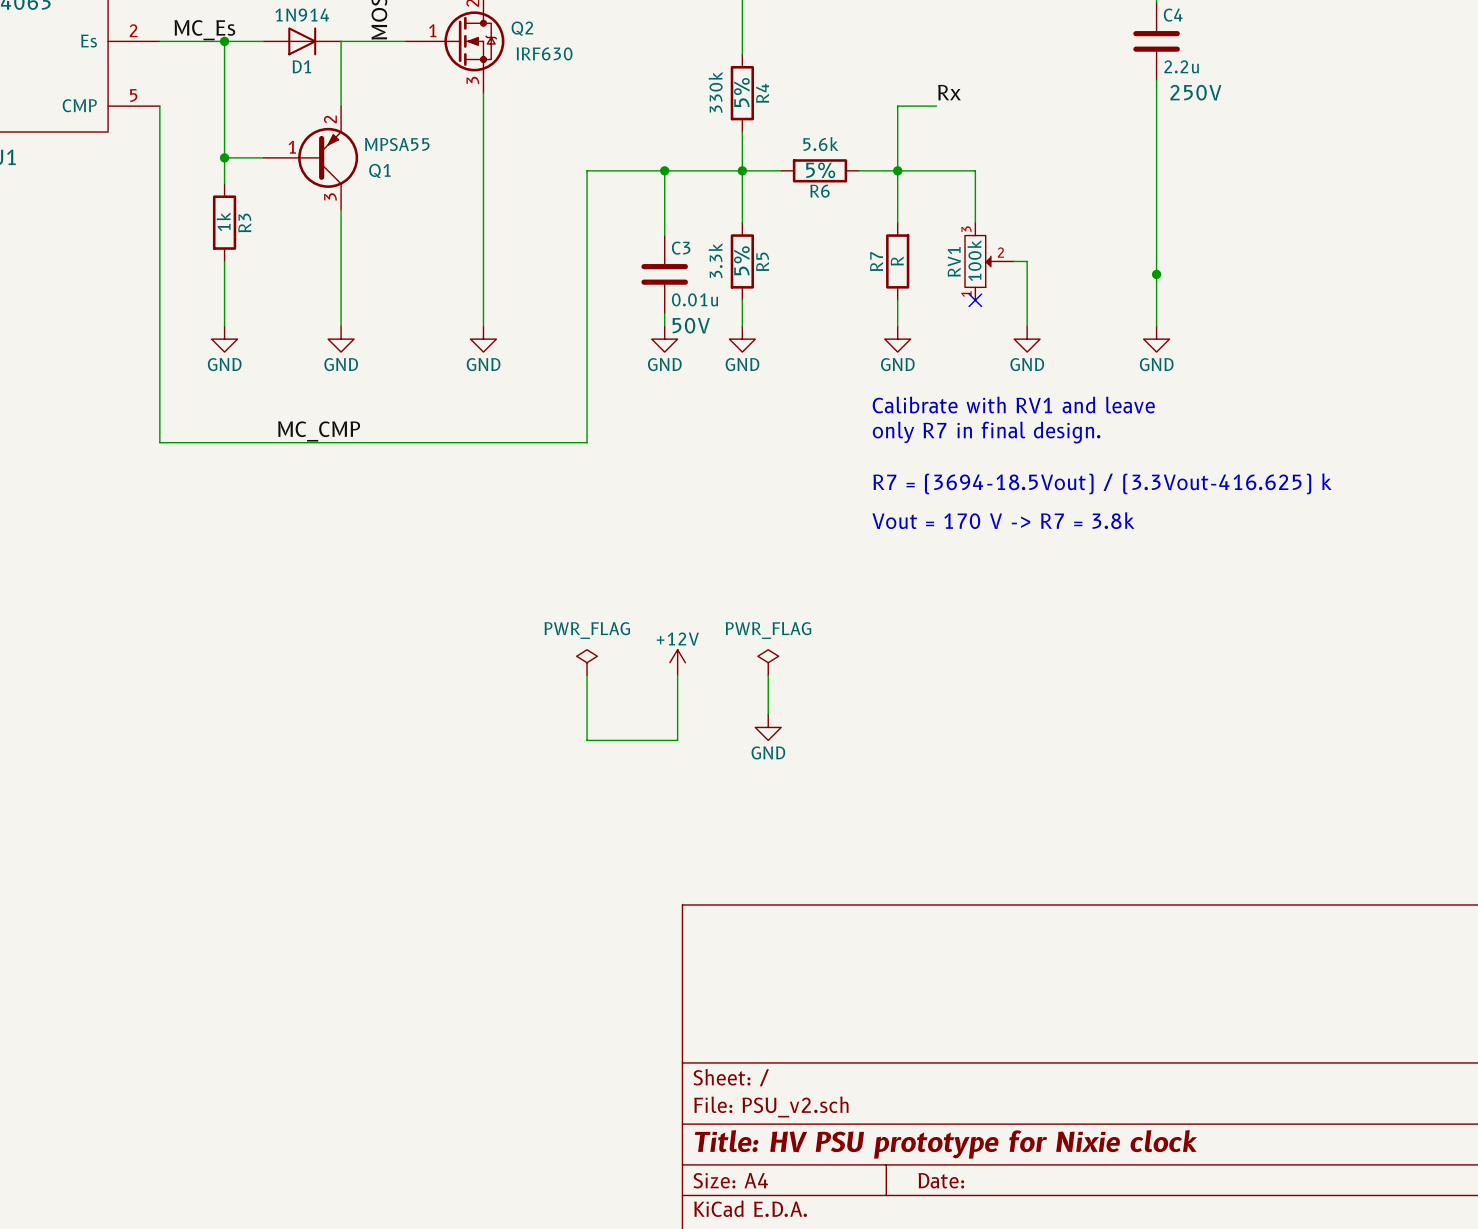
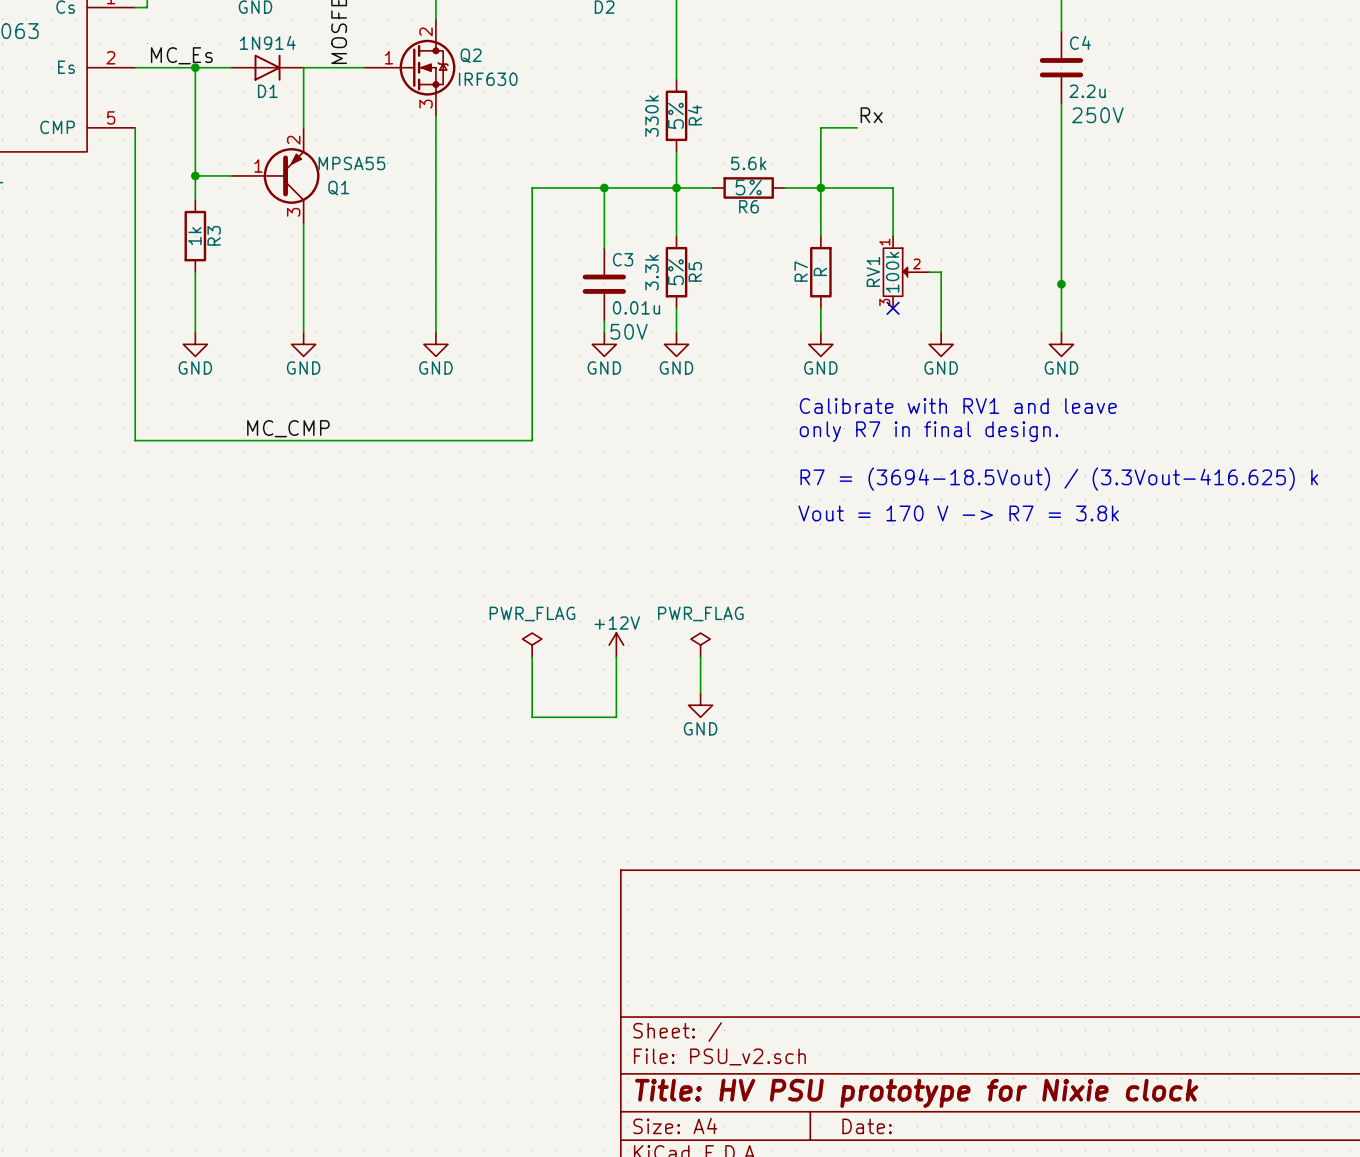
RV1 flip: as is (977, 261) -> up-down (895, 272)

